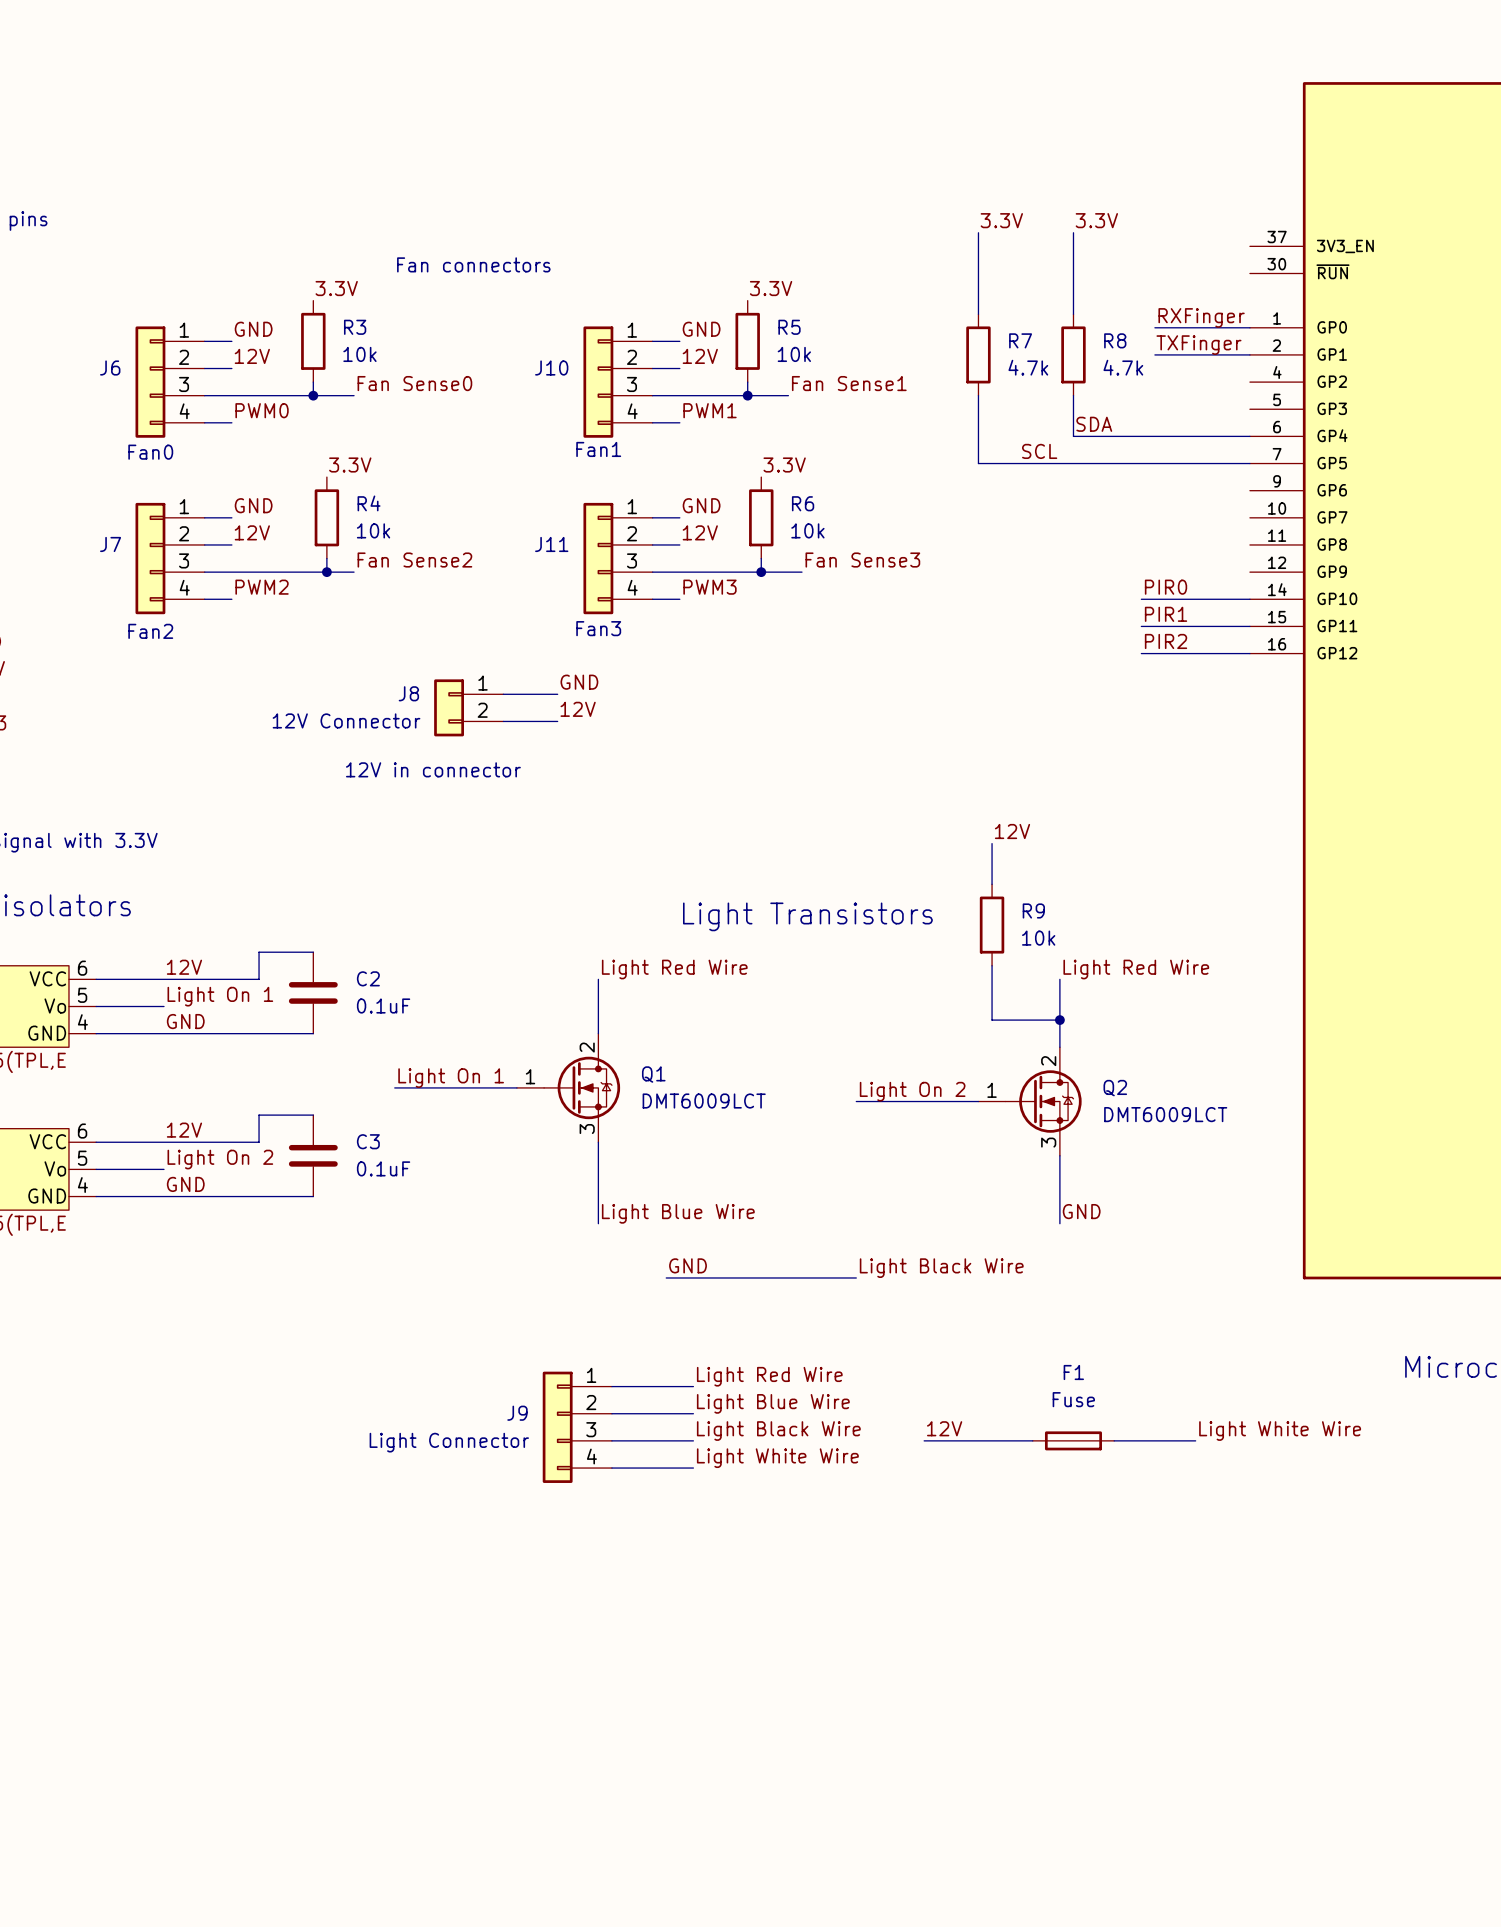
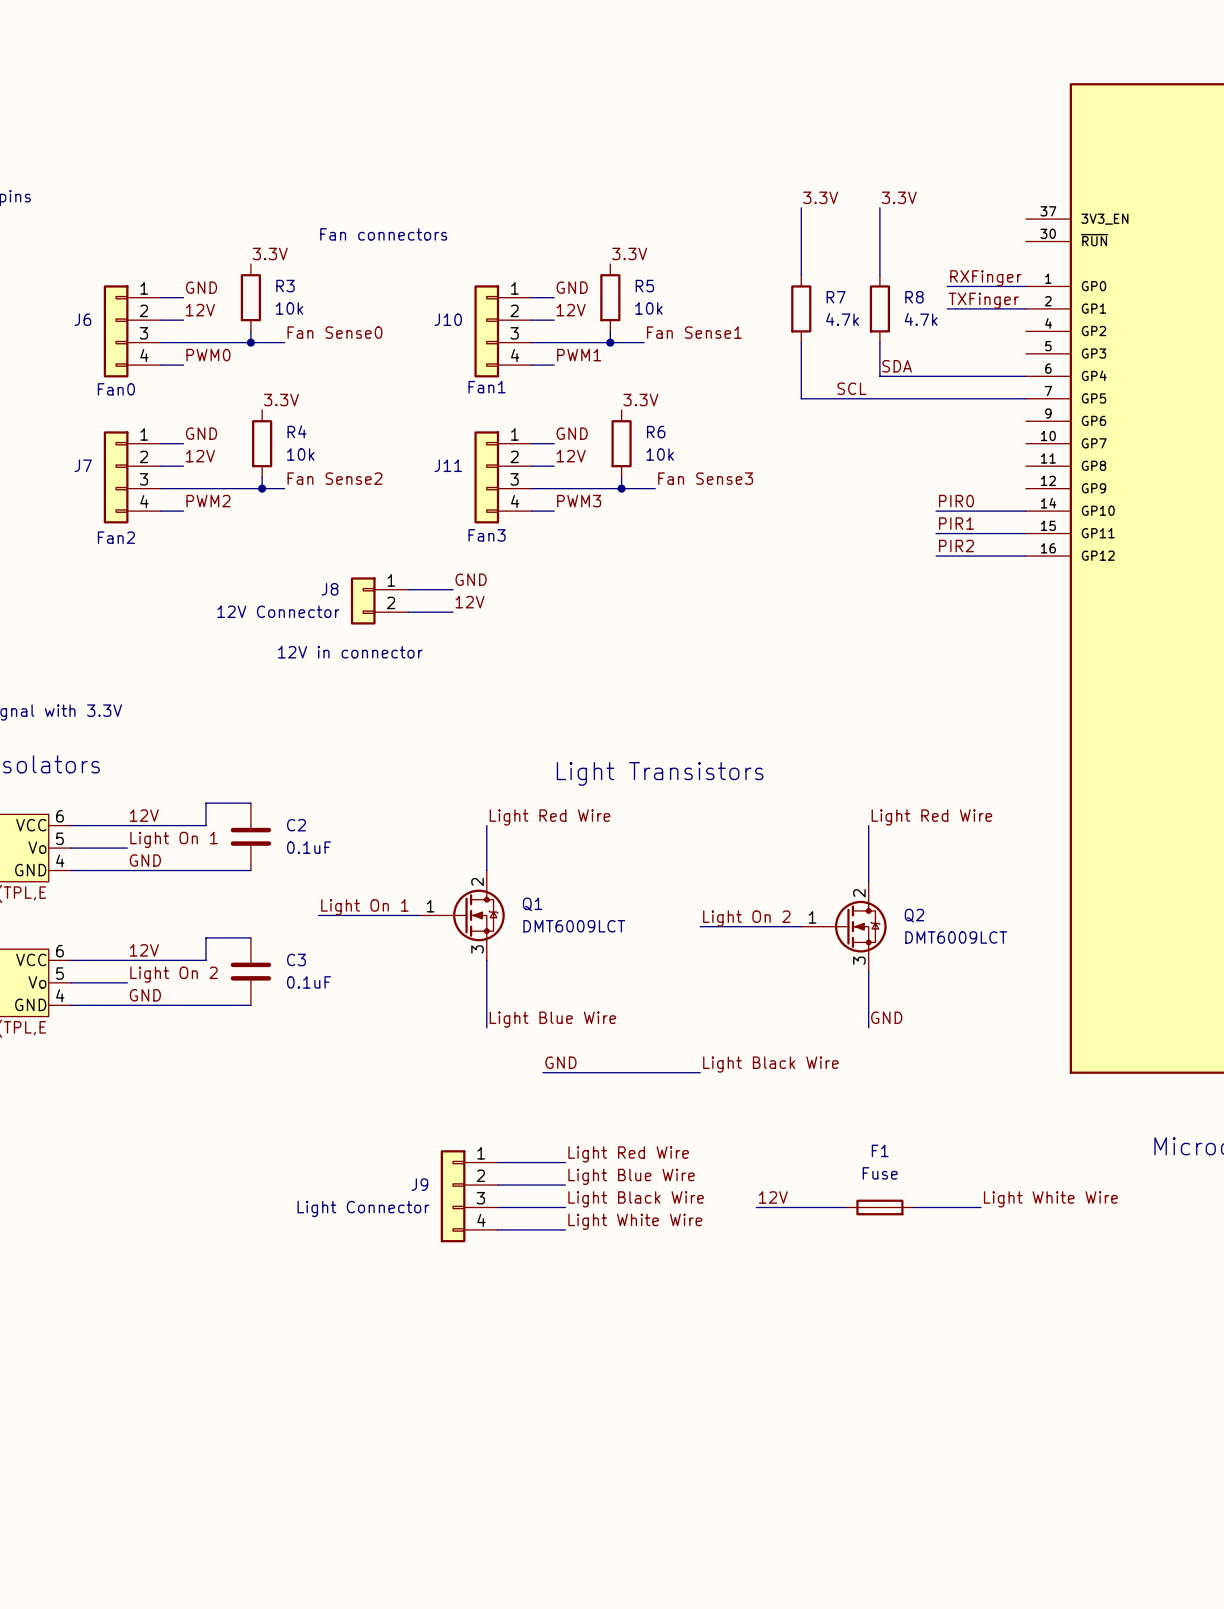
label: 12V (1012, 831) -> none
wire: (992, 843) (992, 884) -> none
R9: 10k (992, 925) -> none
wire: (992, 965) (992, 1020) (1059, 1020) -> none
junction: (1059, 1020) -> none

